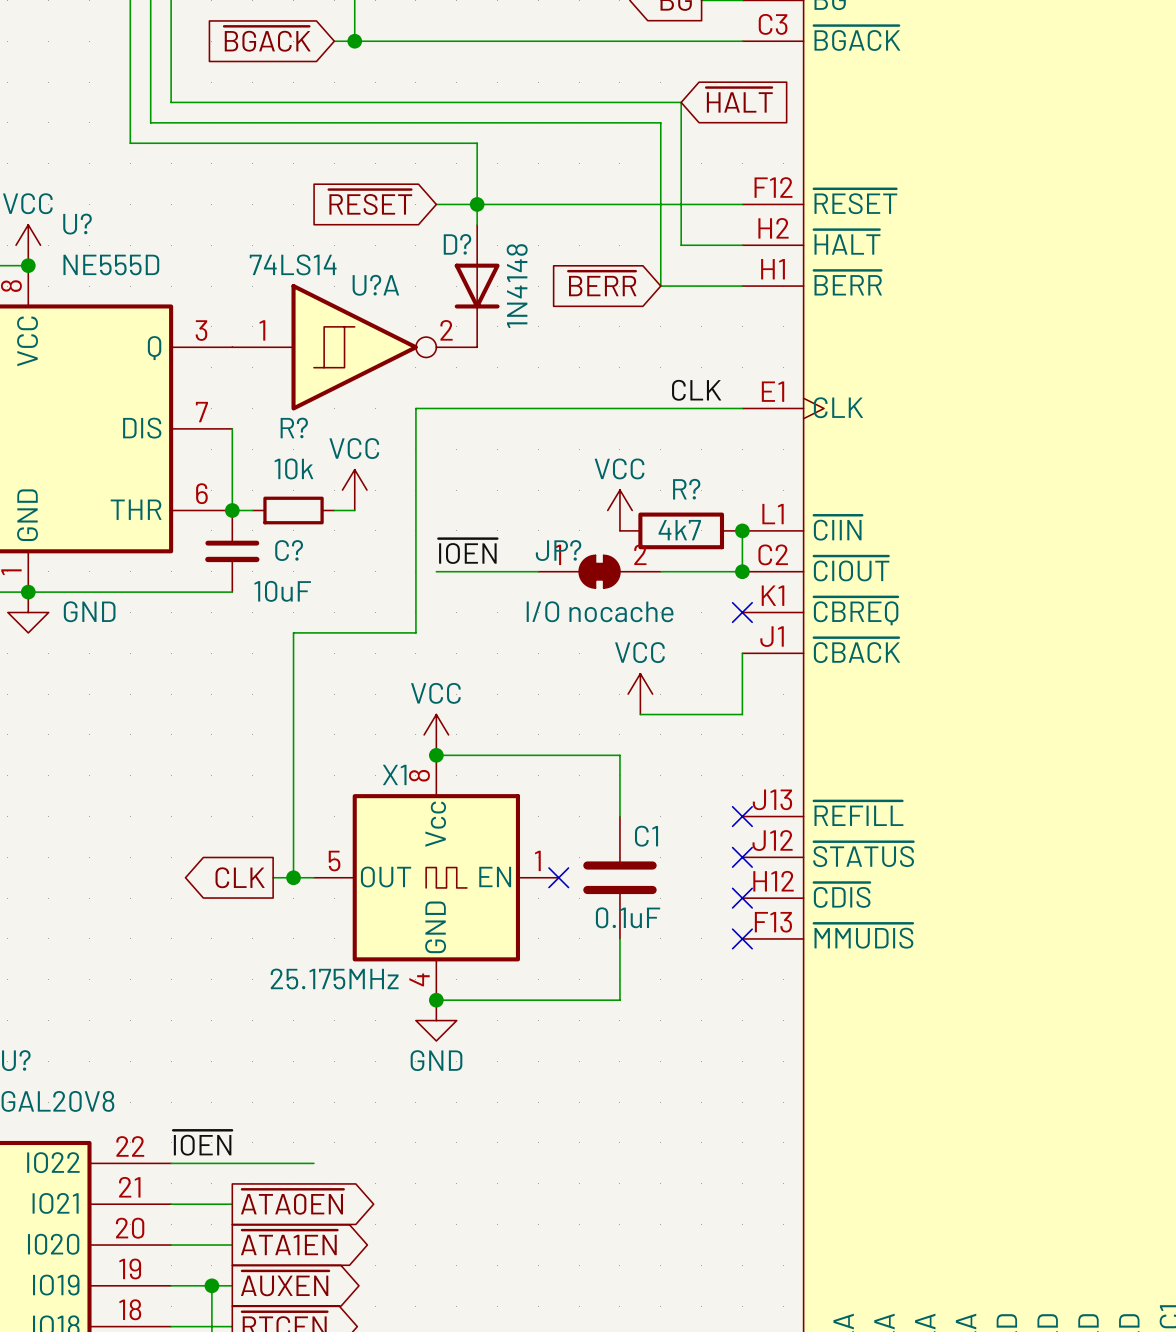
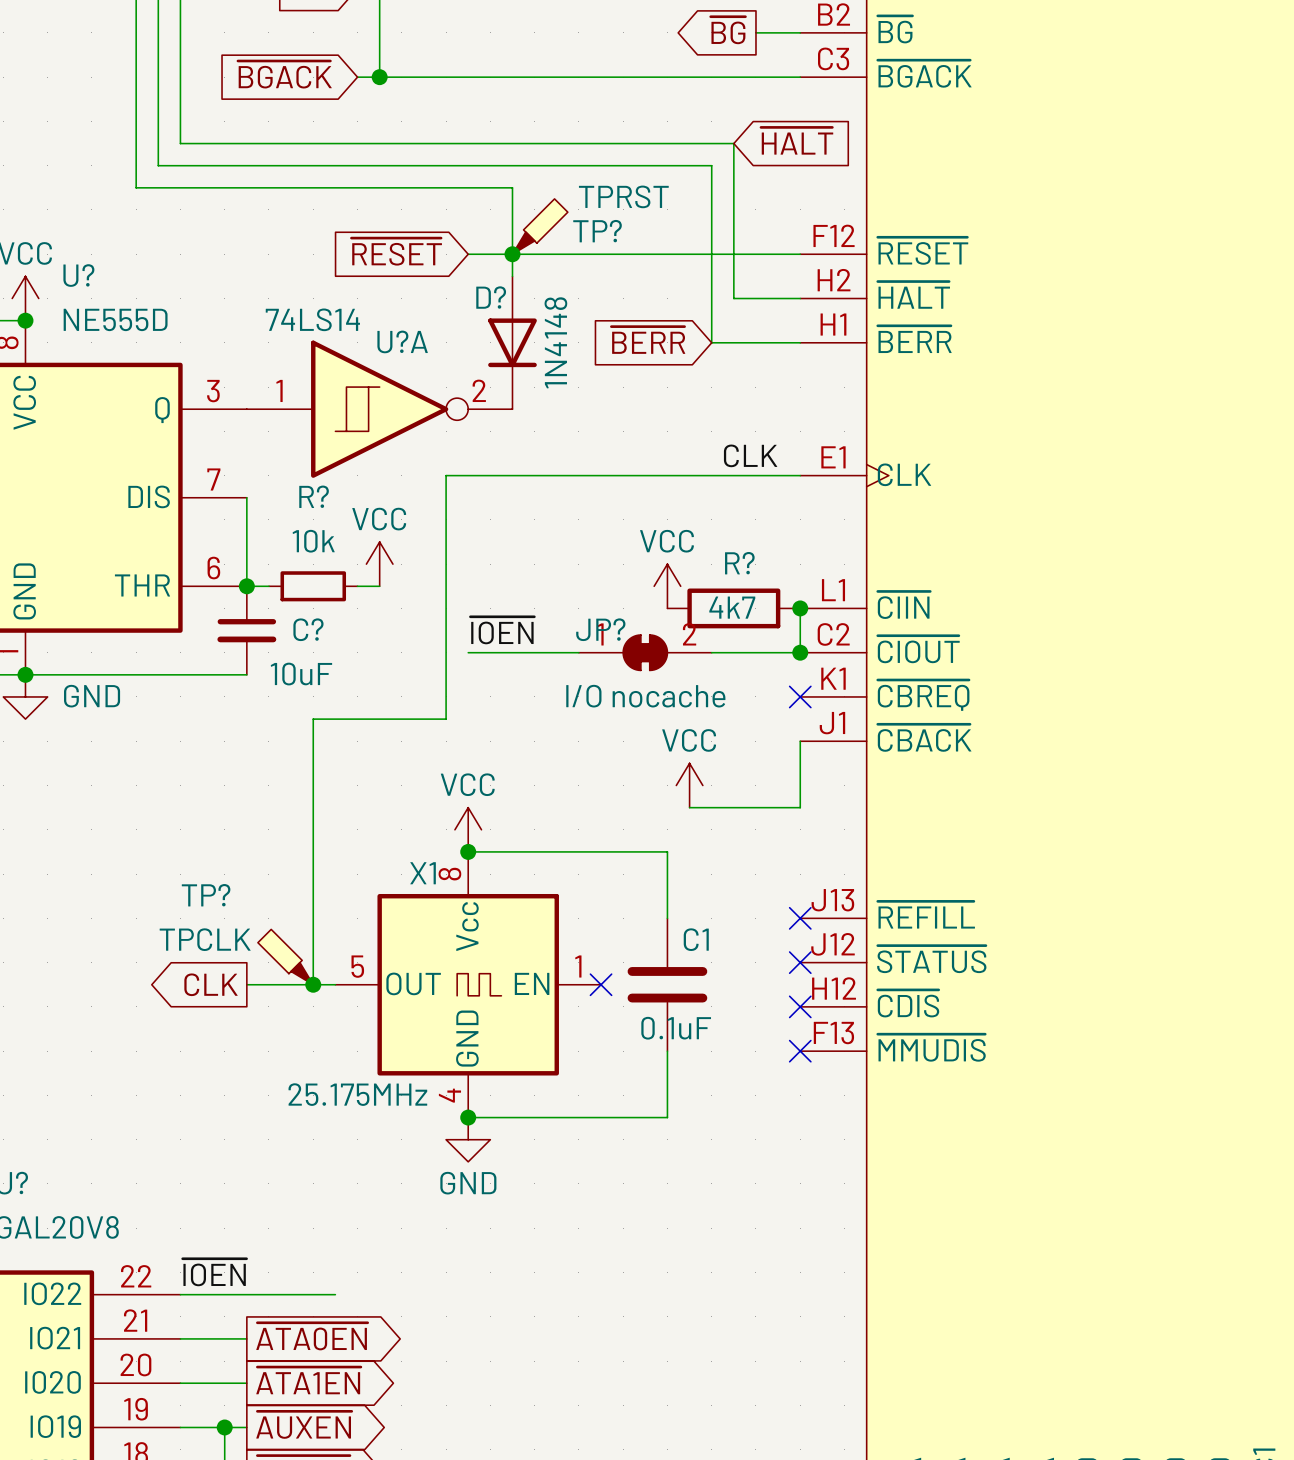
TP?: none -> TPRST (540, 226)
TP?: none -> TPCLK (285, 957)
wire: none -> (246, 984) (291, 984)
global label position: CLK (240, 877) -> CLK (211, 984)

